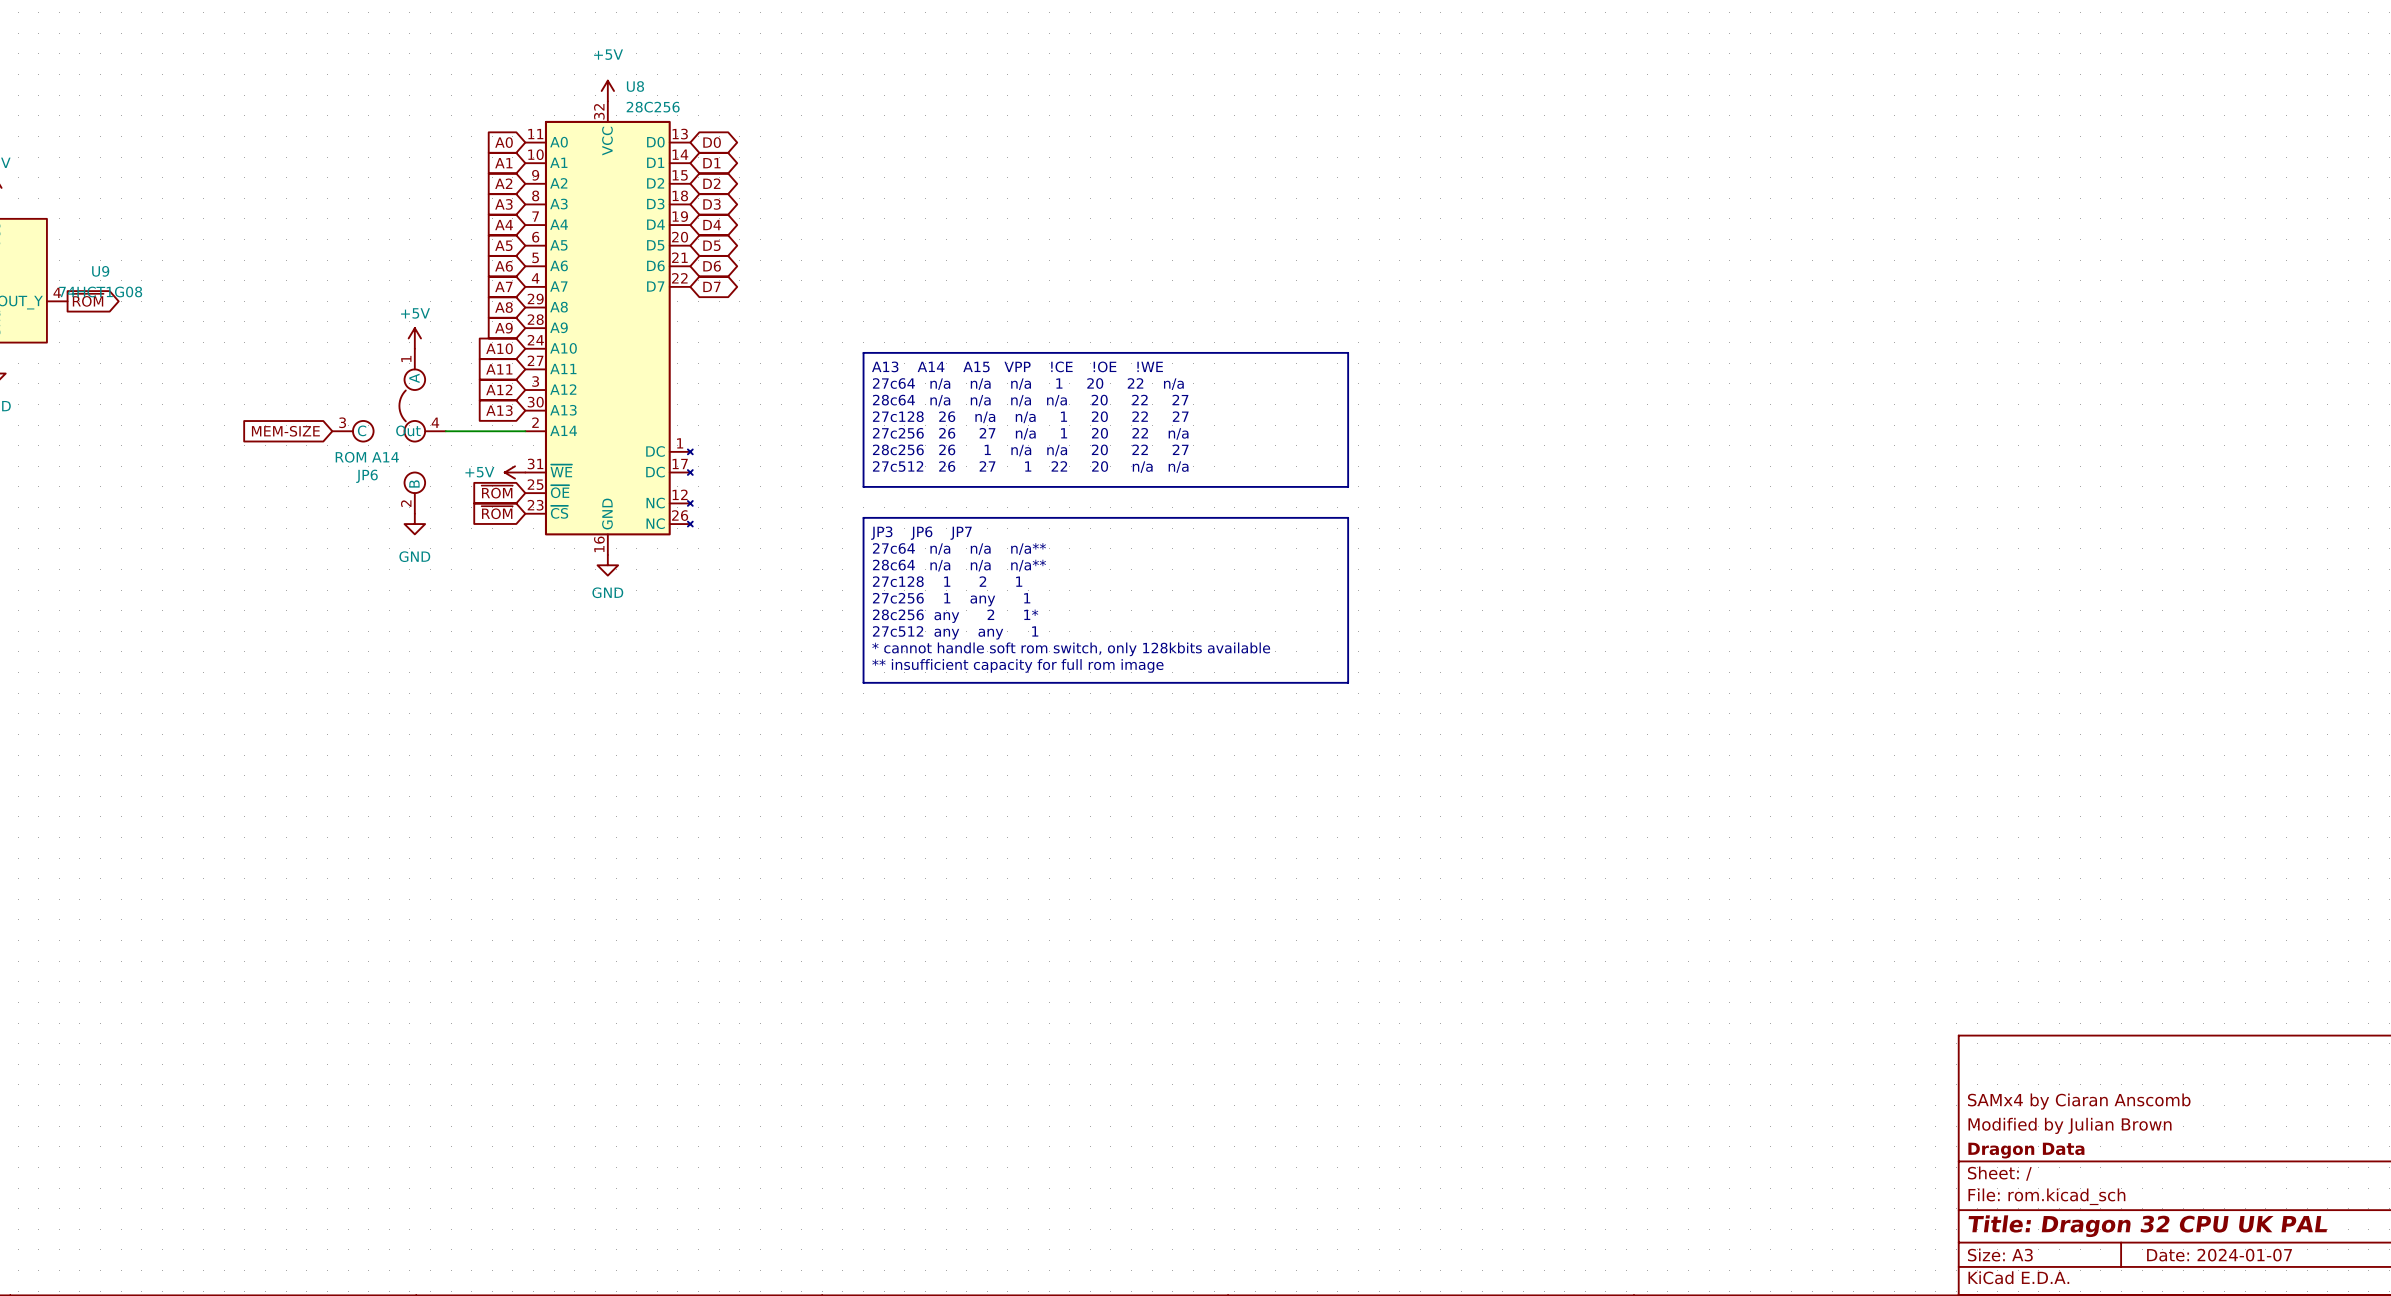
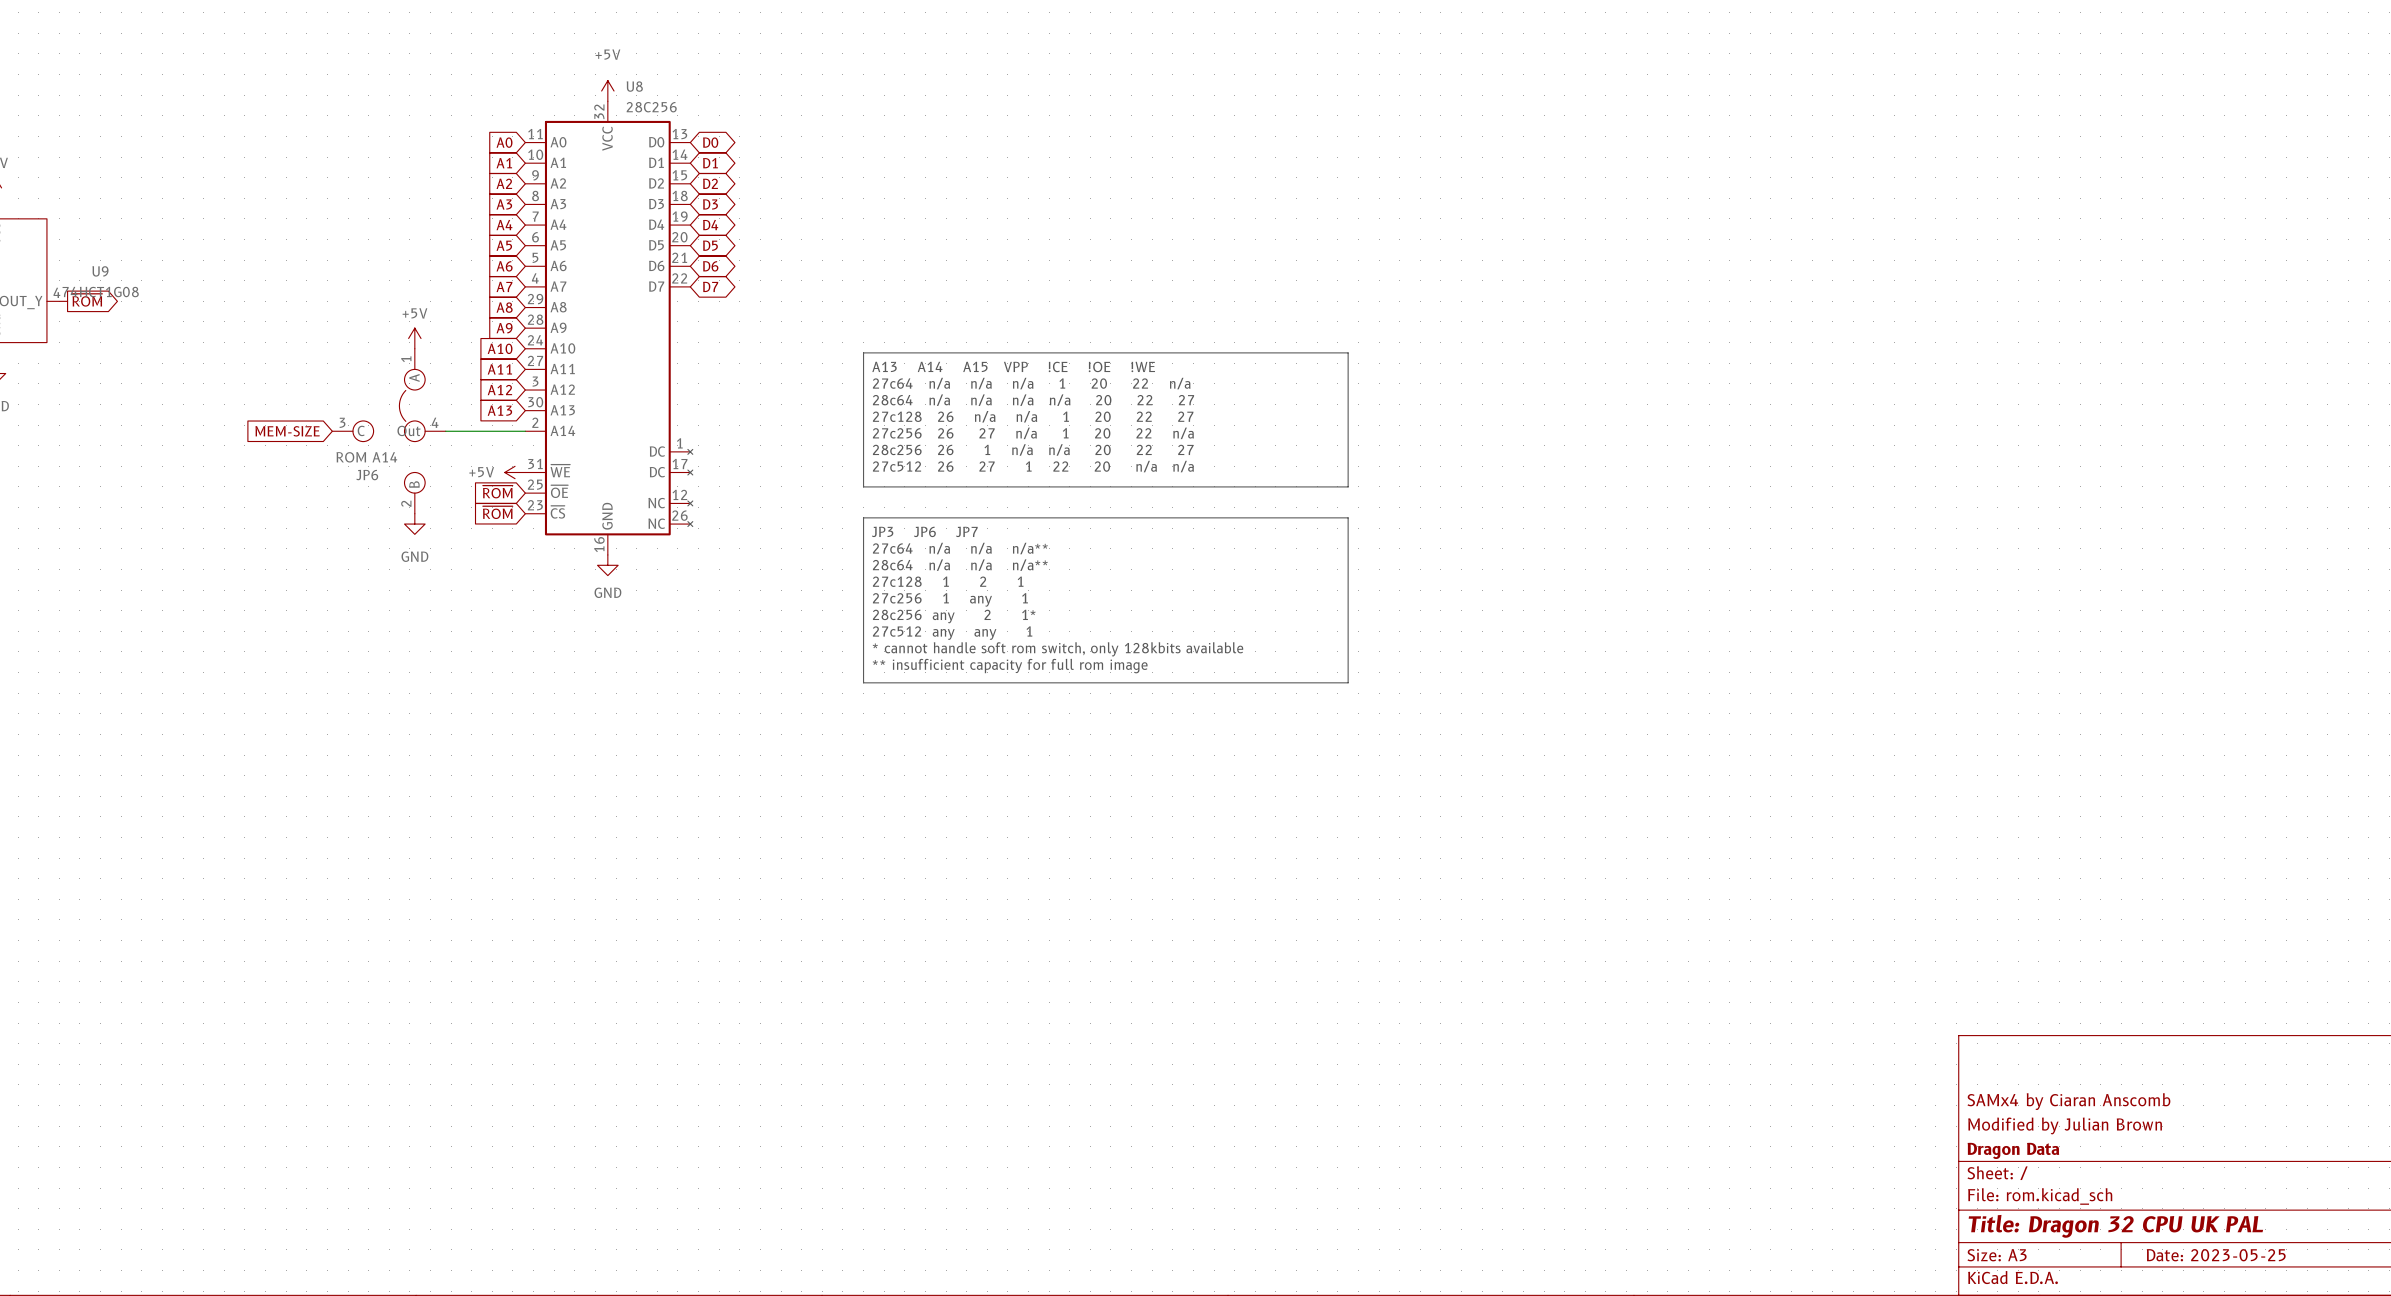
title block: Date: 2024-01-07 (2219, 1255) -> Date: 2023-05-25 (2216, 1255)

